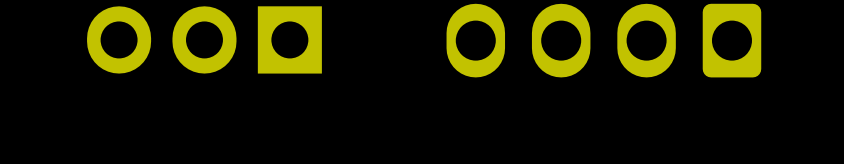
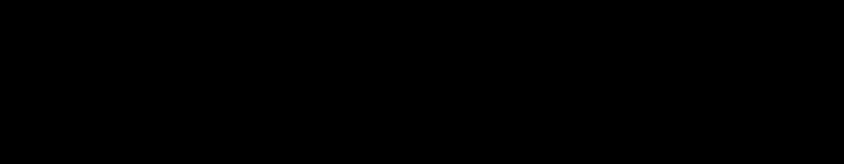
part: (204, 39) -> none
part: (603, 40) -> none

